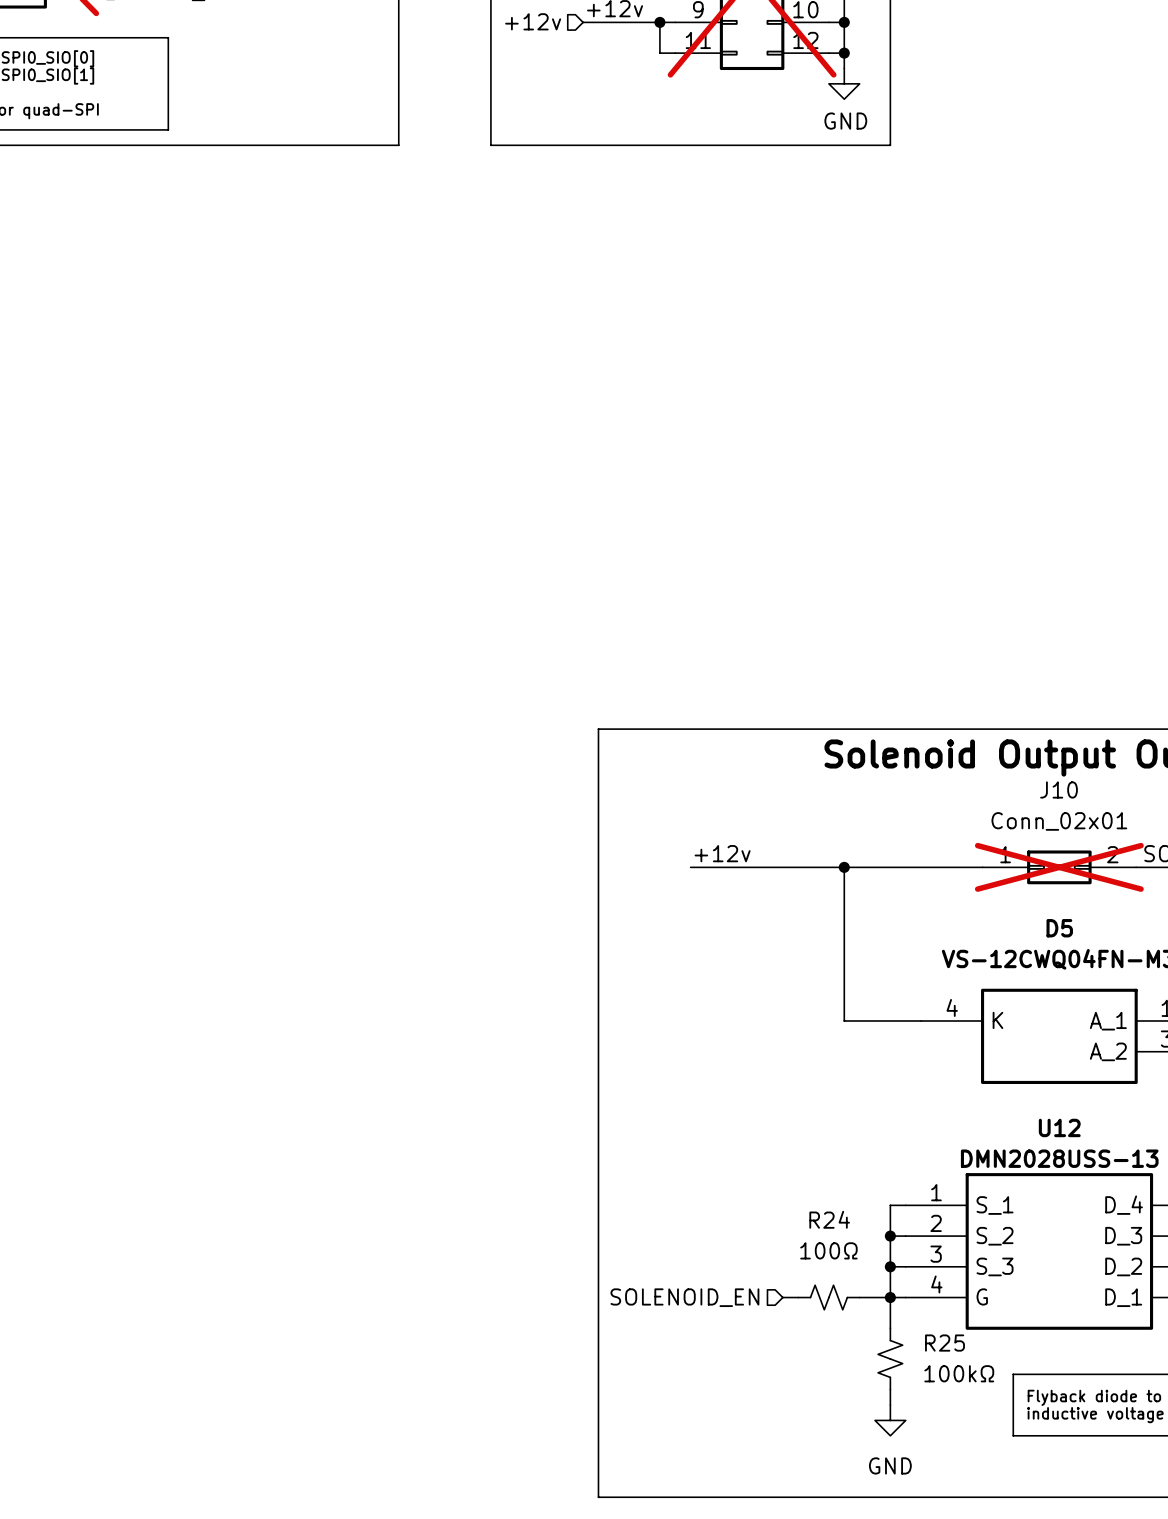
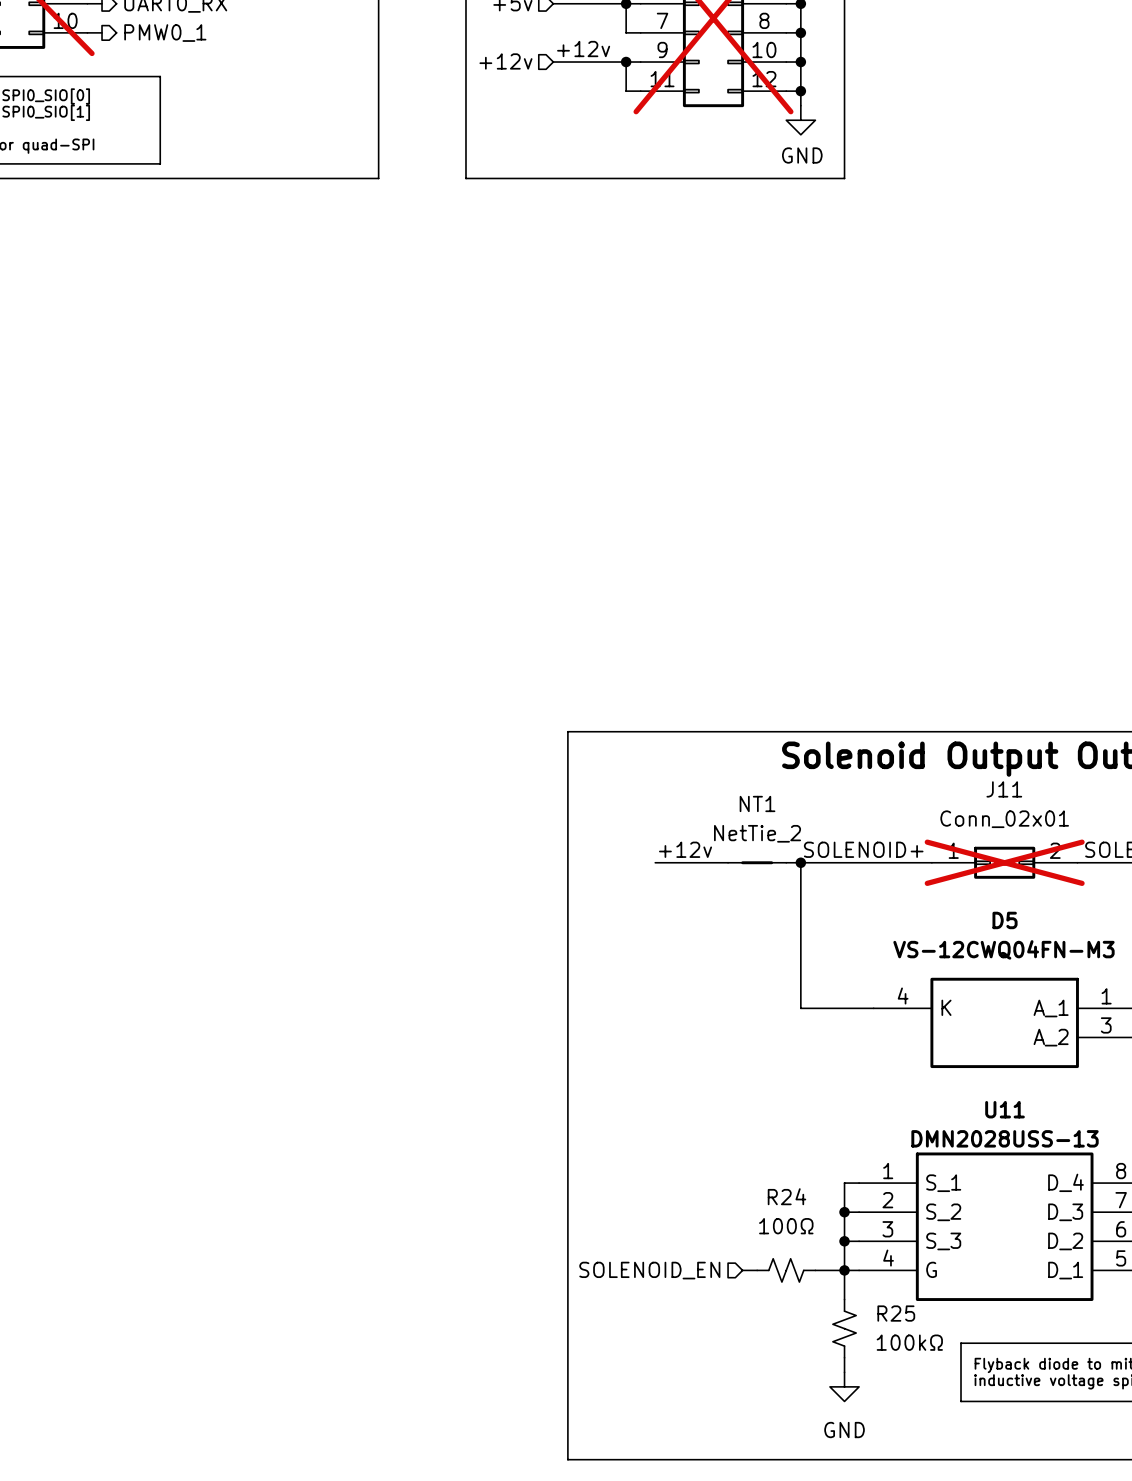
J10 name: J10 (1059, 789) -> J11 (1004, 789)
label: none -> SOLENOID+ (863, 849)
NT1: none -> NetTie_2 (757, 862)
U12 name: U12 (1059, 1127) -> U11 (1005, 1109)

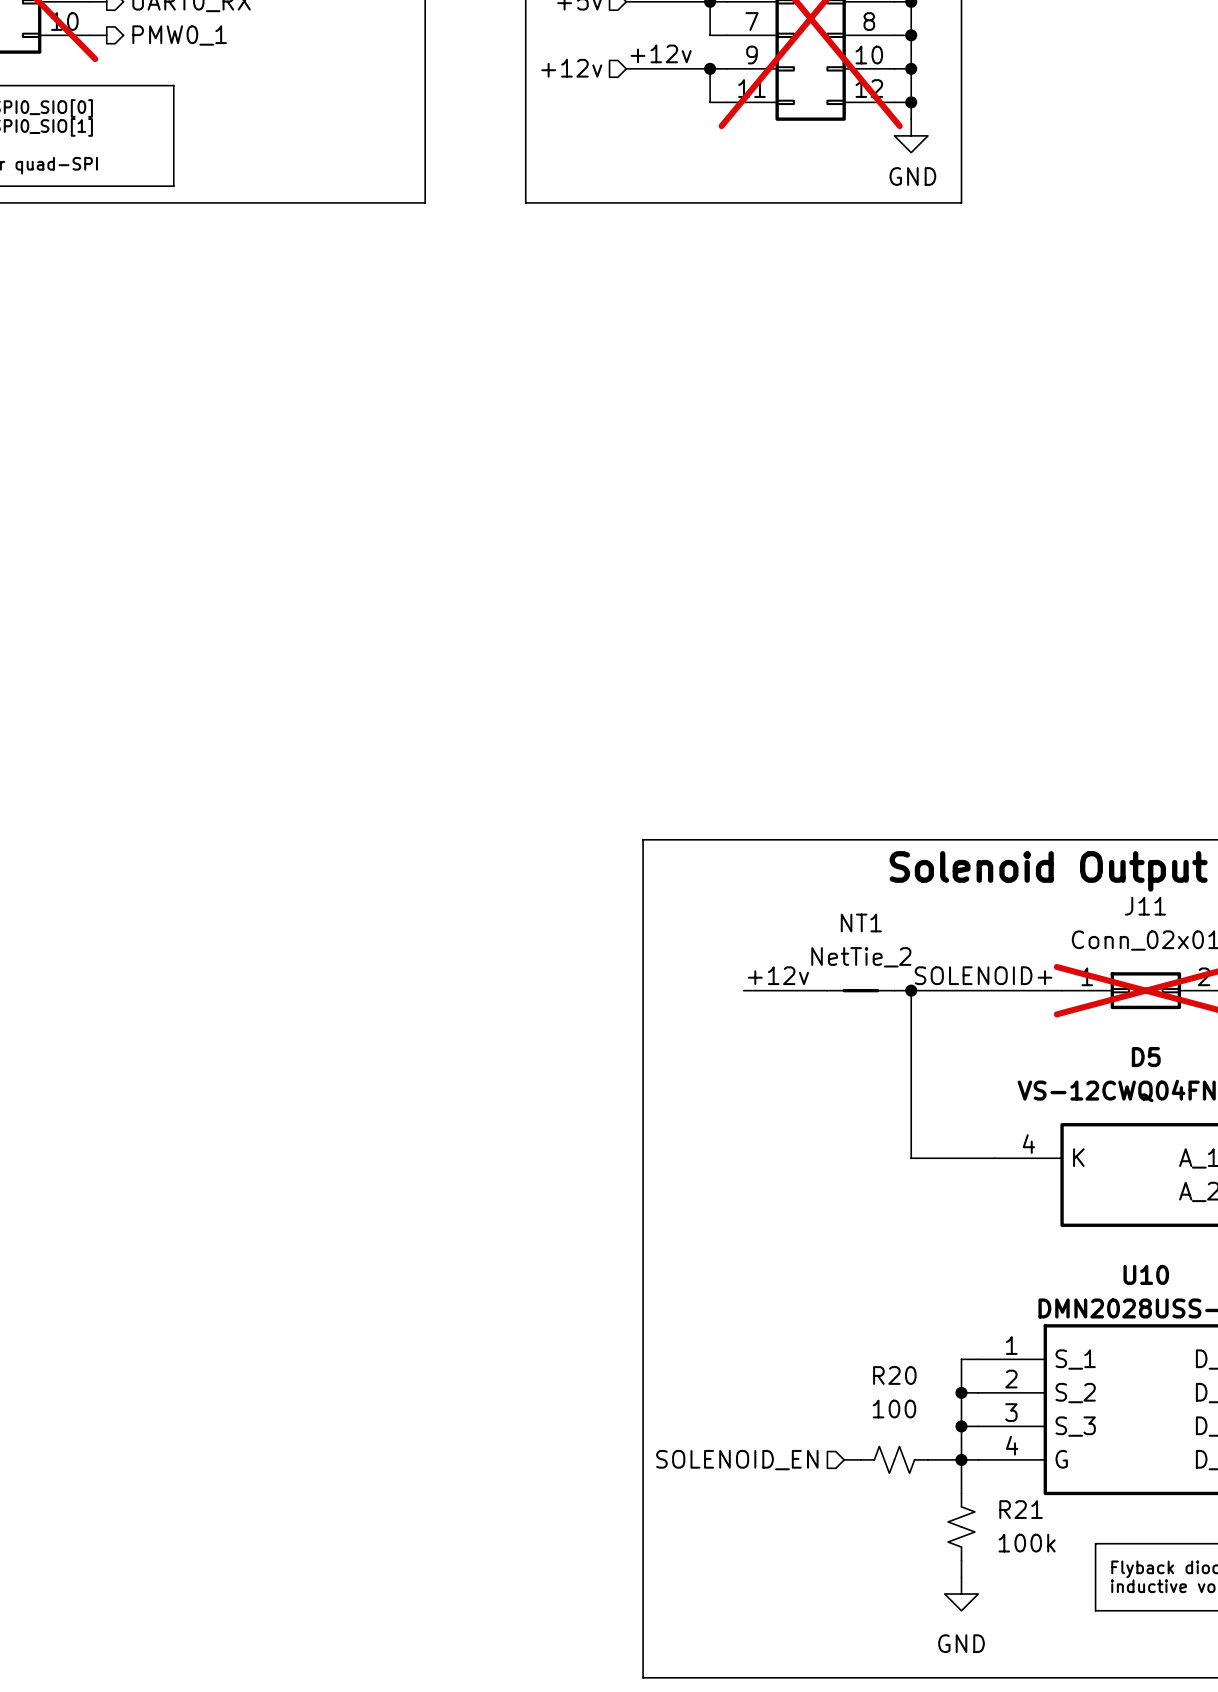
U11 name: U11 (1005, 1109) -> U10 (1146, 1274)
R24 name: R24 (786, 1196) -> R20 (894, 1375)
R24 value: 100Ω (786, 1226) -> 100 (894, 1409)
R25 name: R25 (896, 1313) -> R21 (1021, 1509)
R25 value: 100kΩ (909, 1342) -> 100k (1027, 1543)

